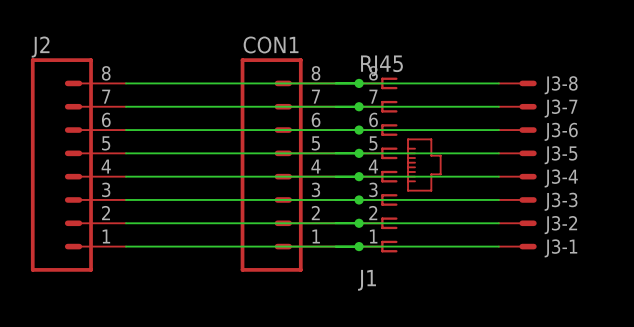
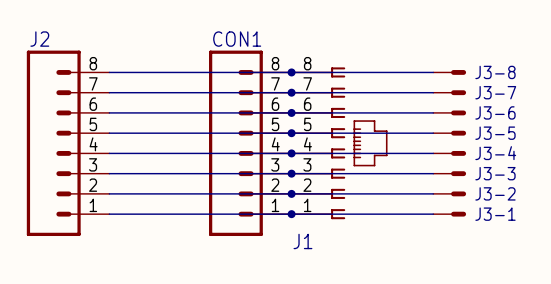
J1 value: RJ45 (381, 65) -> none
J1 symbol: [359, 77, 442, 253] -> [291, 67, 388, 220]
junction: none -> (291, 72)
junction: (359, 83) -> none
junction: none -> (291, 92)
junction: (359, 106) -> none
junction: none -> (291, 112)
junction: (359, 130) -> none
junction: none -> (291, 133)
junction: (359, 153) -> none
junction: none -> (291, 153)
junction: (359, 176) -> none
junction: none -> (291, 173)
junction: (359, 199) -> none
junction: none -> (291, 193)
junction: (359, 223) -> none
junction: none -> (291, 214)
junction: (359, 246) -> none

